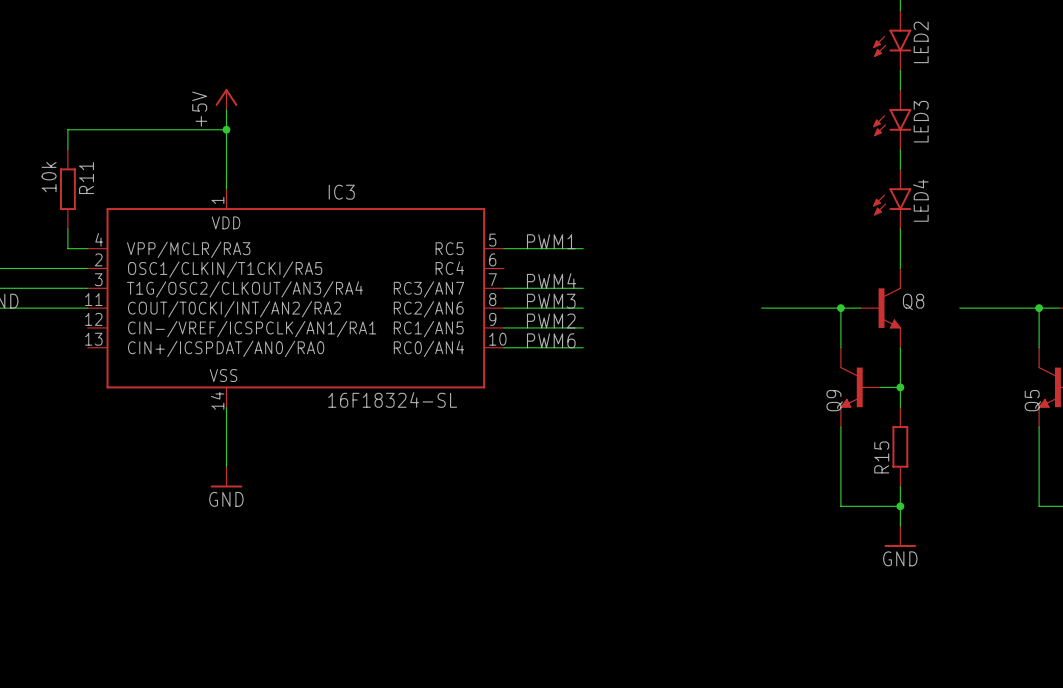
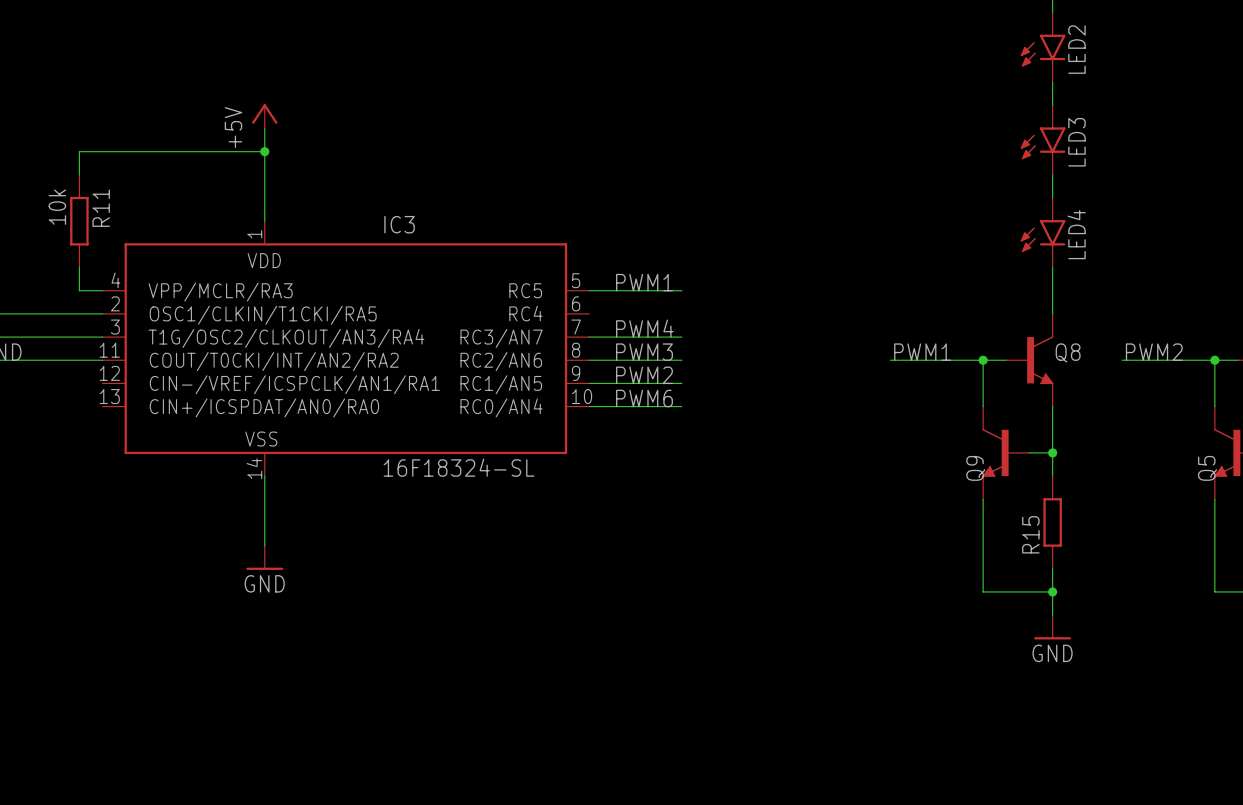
label: none -> PWM1 (922, 352)
label: none -> PWM2 (1154, 352)

